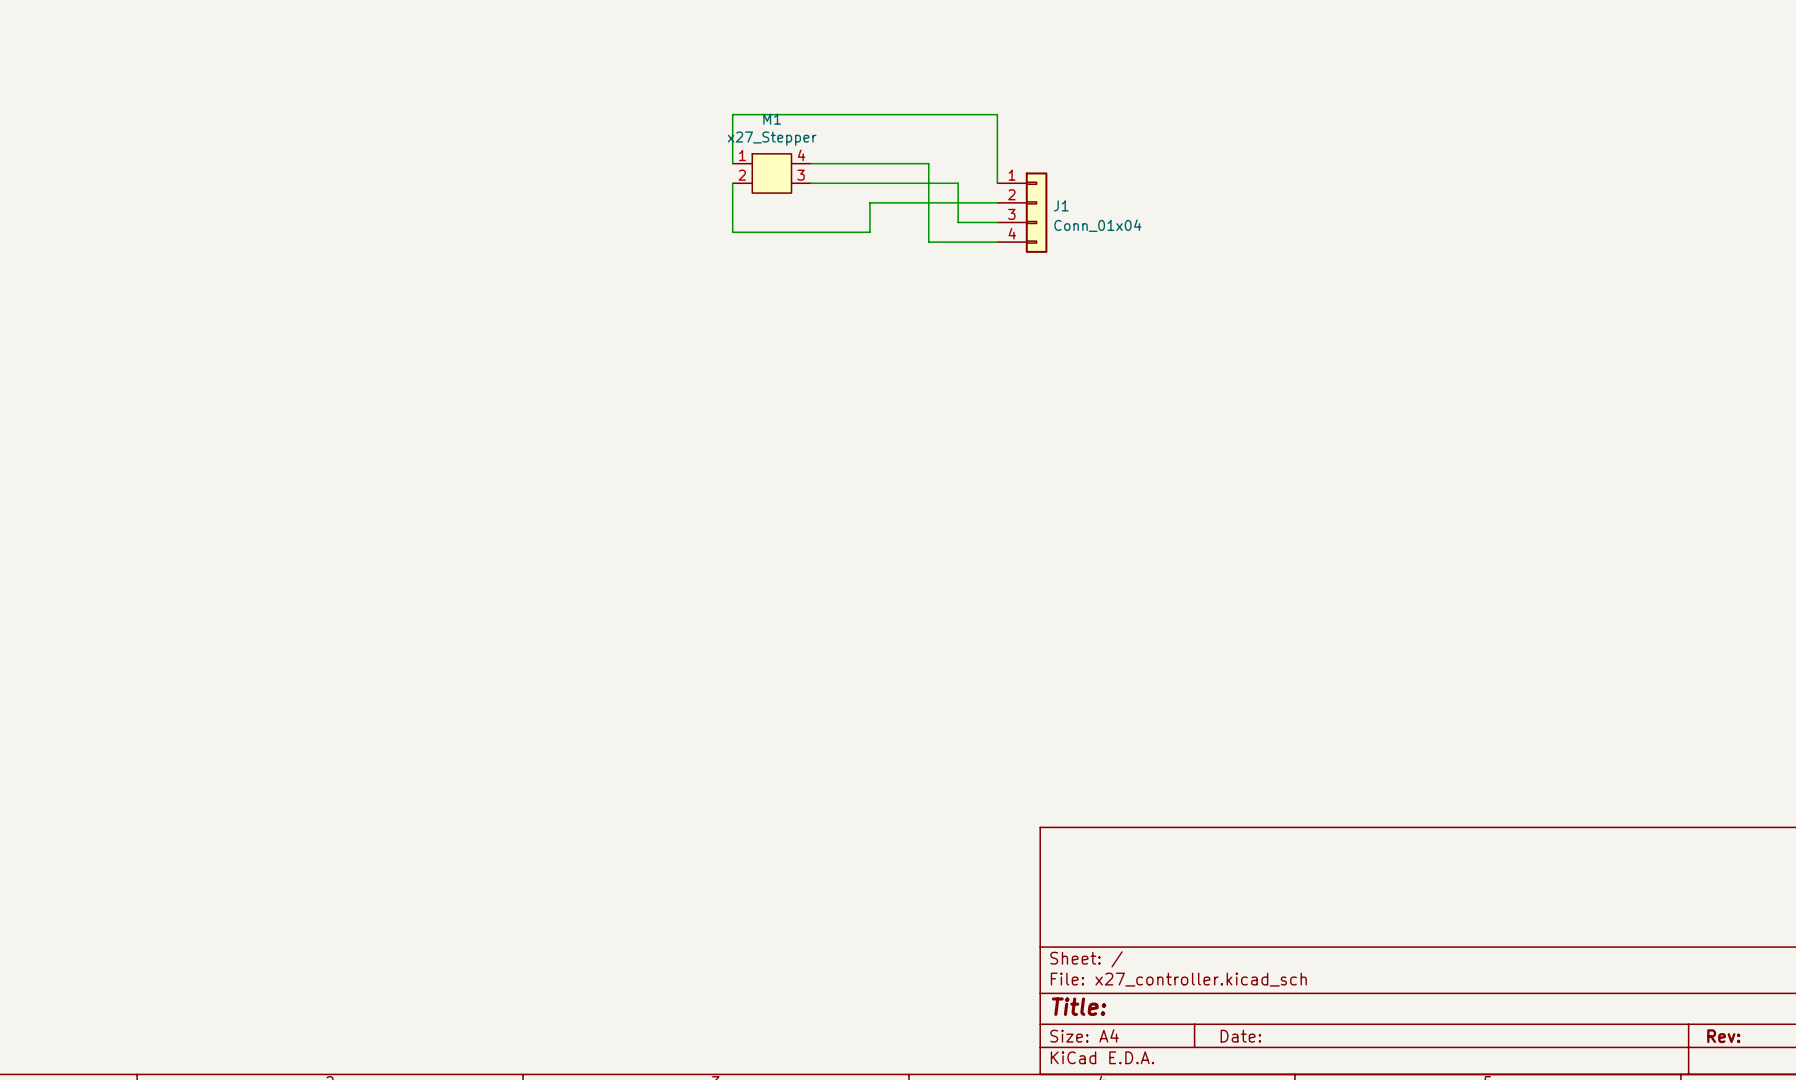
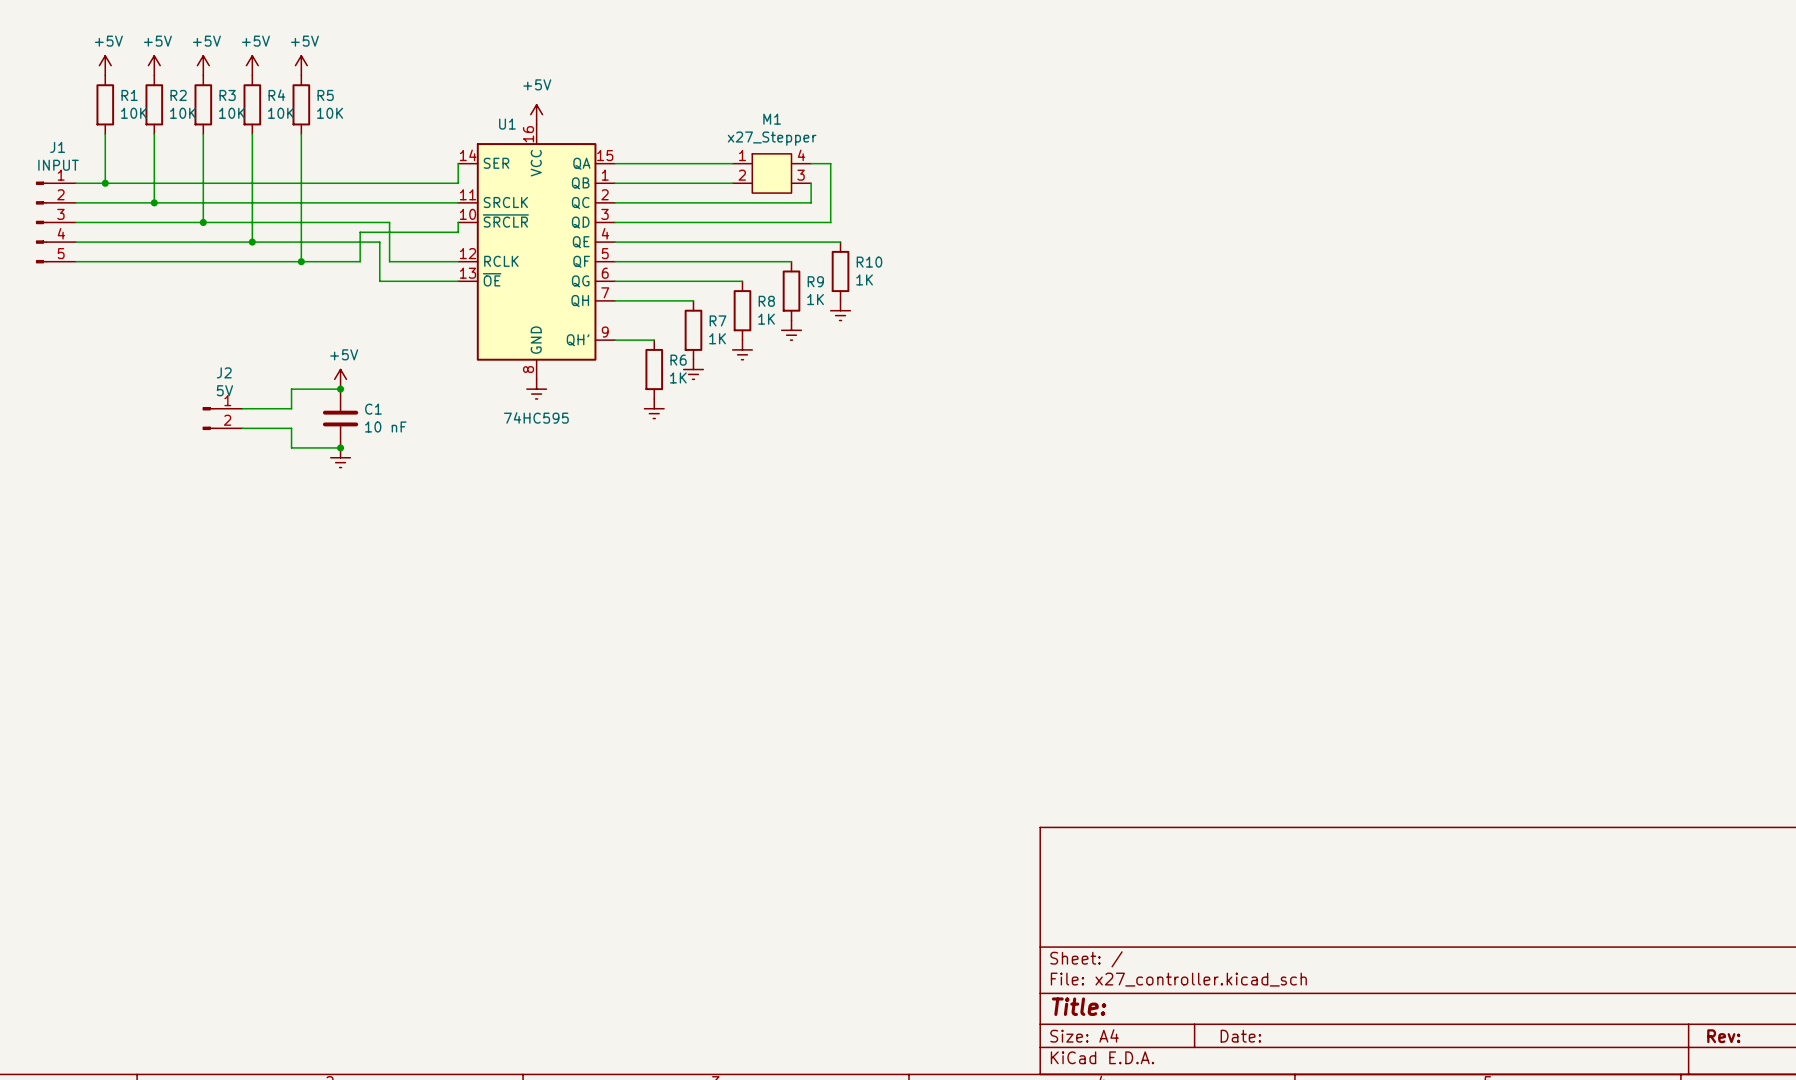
power symbol: none -> +5V (105, 65)
power symbol: none -> +5V (154, 65)
power symbol: none -> +5V (203, 65)
power symbol: none -> +5V (252, 65)
power symbol: none -> +5V (301, 65)
R1: none -> 10K (105, 104)
R2: none -> 10K (154, 104)
R3: none -> 10K (203, 104)
R4: none -> 10K (252, 104)
R5: none -> 10K (301, 104)
power symbol: none -> +5V (536, 114)
wire: none -> (105, 134) (105, 183)
wire: none -> (154, 134) (154, 202)
wire: none -> (203, 134) (203, 222)
wire: none -> (252, 134) (252, 242)
wire: none -> (301, 134) (301, 261)
wire: none -> (458, 163) (458, 183) (75, 183)
wire: (732, 163) (732, 114) (997, 114) (997, 183) -> (732, 163) (615, 163)
wire: (830, 163) (928, 163) (928, 242) (997, 242) -> (830, 163) (830, 222) (615, 222)
J1 symbol: [997, 172, 1048, 253] -> [36, 181, 76, 264]
junction: none -> (105, 183)
wire: (732, 183) (732, 232) (869, 232) (869, 202) (997, 202) -> (732, 183) (615, 183)
wire: (811, 183) (958, 183) (958, 222) (997, 222) -> (811, 183) (811, 202) (615, 202)
wire: none -> (75, 202) (458, 202)
junction: none -> (154, 202)
J1 name position: J1 (1061, 205) -> J1 (57, 147)
wire: none -> (75, 222) (389, 222) (389, 261) (458, 261)
junction: none -> (203, 222)
wire: none -> (458, 222) (458, 232) (360, 232) (360, 261) (75, 261)
J1 value: Conn_01x04 (1097, 225) -> INPUT (58, 165)
wire: none -> (75, 242) (379, 242) (379, 281) (458, 281)
junction: none -> (252, 242)
wire: none -> (615, 242) (840, 242)
U1: none -> 74HC595 (536, 251)
junction: none -> (301, 261)
wire: none -> (615, 261) (791, 261)
R10: none -> 1K (840, 271)
wire: none -> (615, 281) (742, 281)
R9: none -> 1K (791, 291)
wire: none -> (615, 300) (693, 300)
R8: none -> 1K (742, 310)
power symbol: none -> (840, 310)
R7: none -> 1K (693, 330)
power symbol: none -> (791, 330)
wire: none -> (615, 340) (654, 340)
power symbol: none -> (742, 349)
R6: none -> 1K (654, 369)
power symbol: none -> (693, 369)
power symbol: none -> +5V (340, 379)
wire: none -> (340, 389) (291, 389) (291, 408) (242, 408)
junction: none -> (340, 389)
power symbol: none -> (536, 389)
power symbol: none -> (654, 408)
J2: none -> 5V (222, 418)
C1: none -> 10 nF (340, 418)
wire: none -> (242, 428) (291, 428) (291, 447) (340, 447)
junction: none -> (340, 447)
power symbol: none -> (340, 457)

